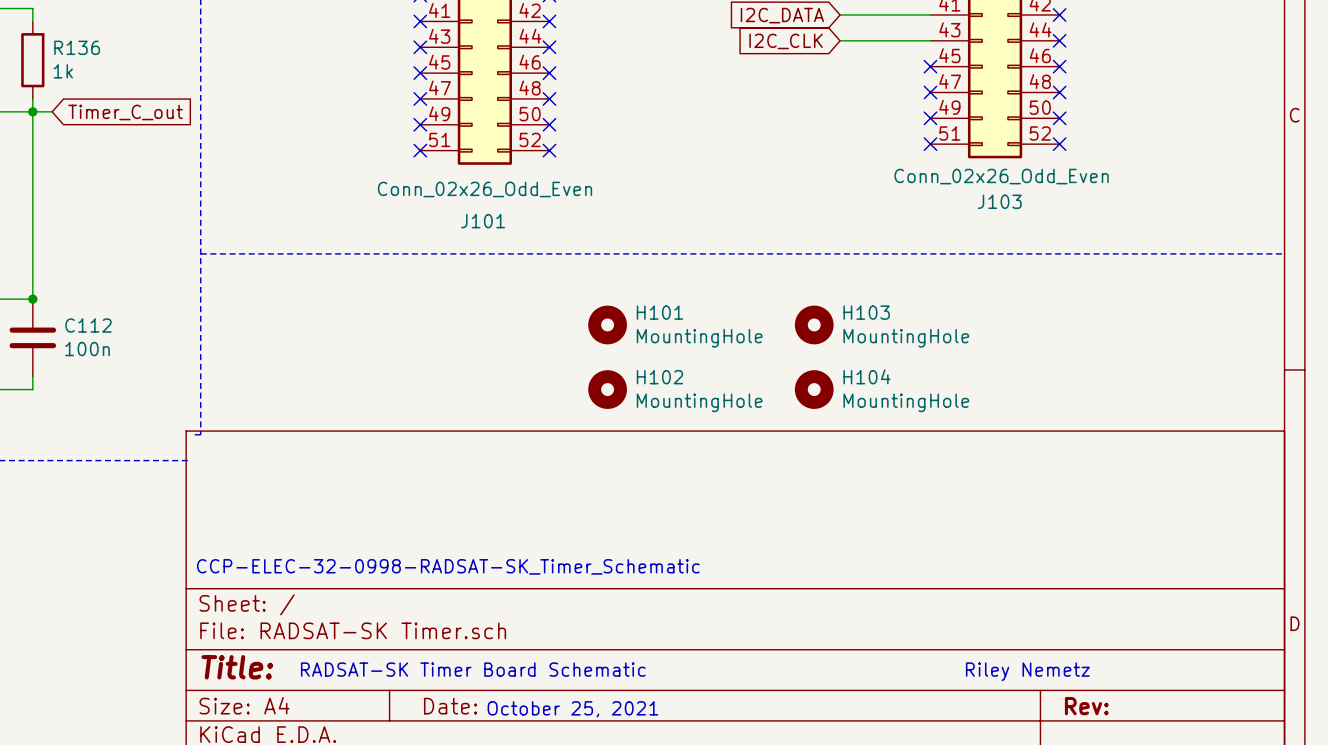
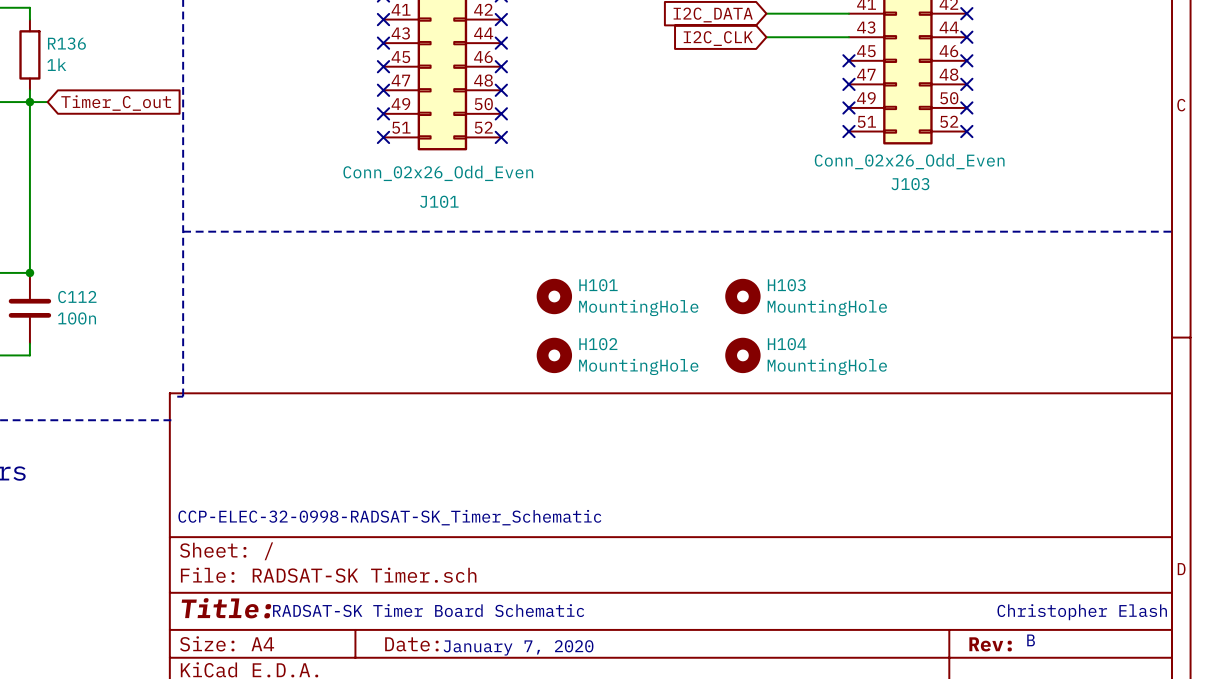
text: Riley Nemetz (1027, 671) -> Christopher Elash (1082, 612)
text: none -> B (1031, 640)
text: October 25, 2021 (572, 709) -> January 7, 2020 (518, 647)

